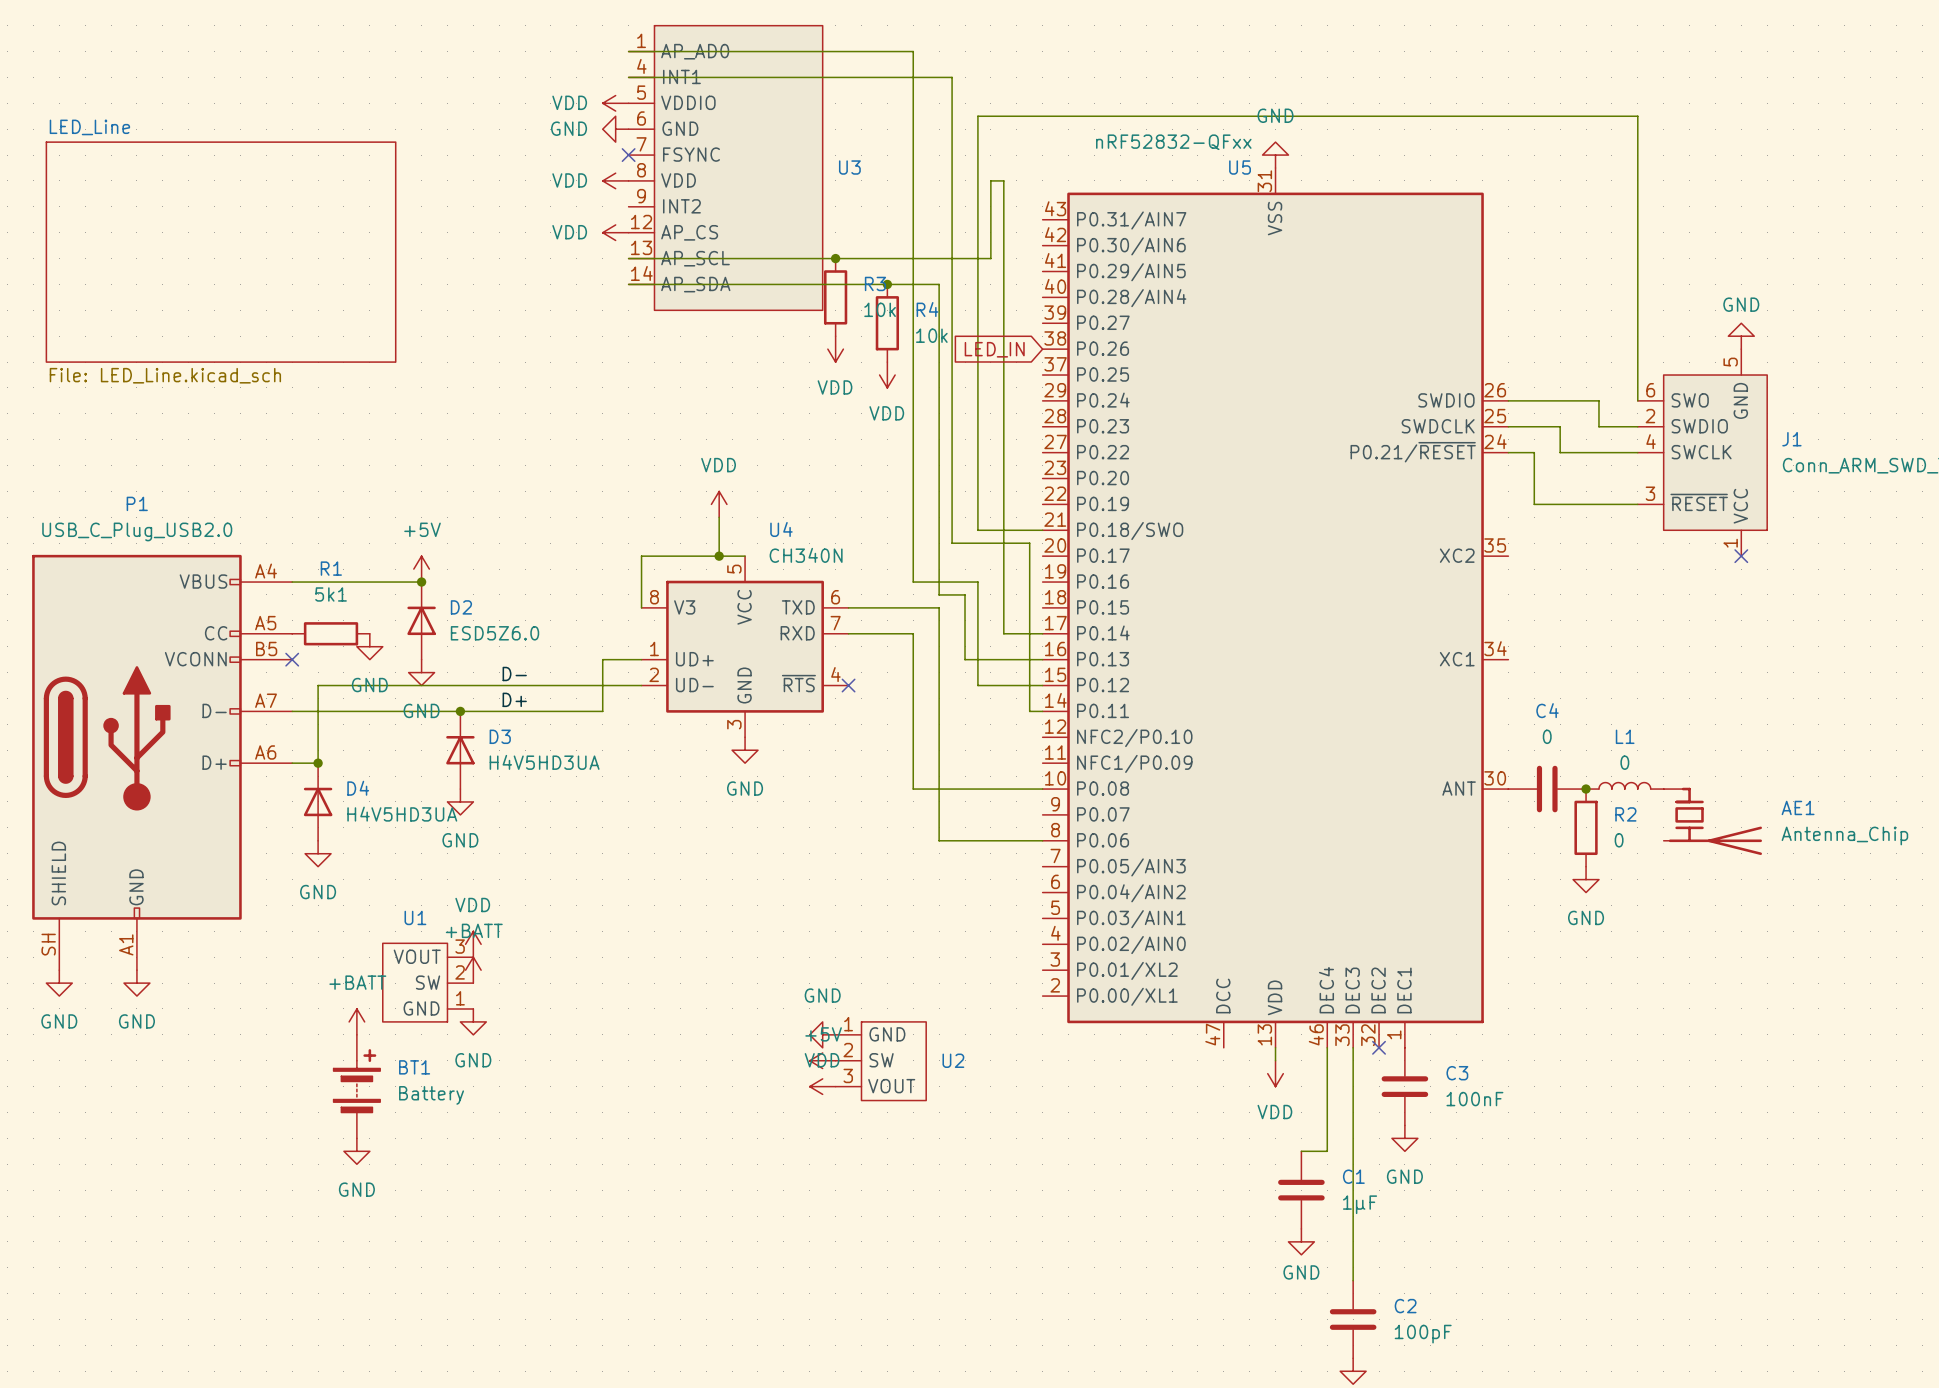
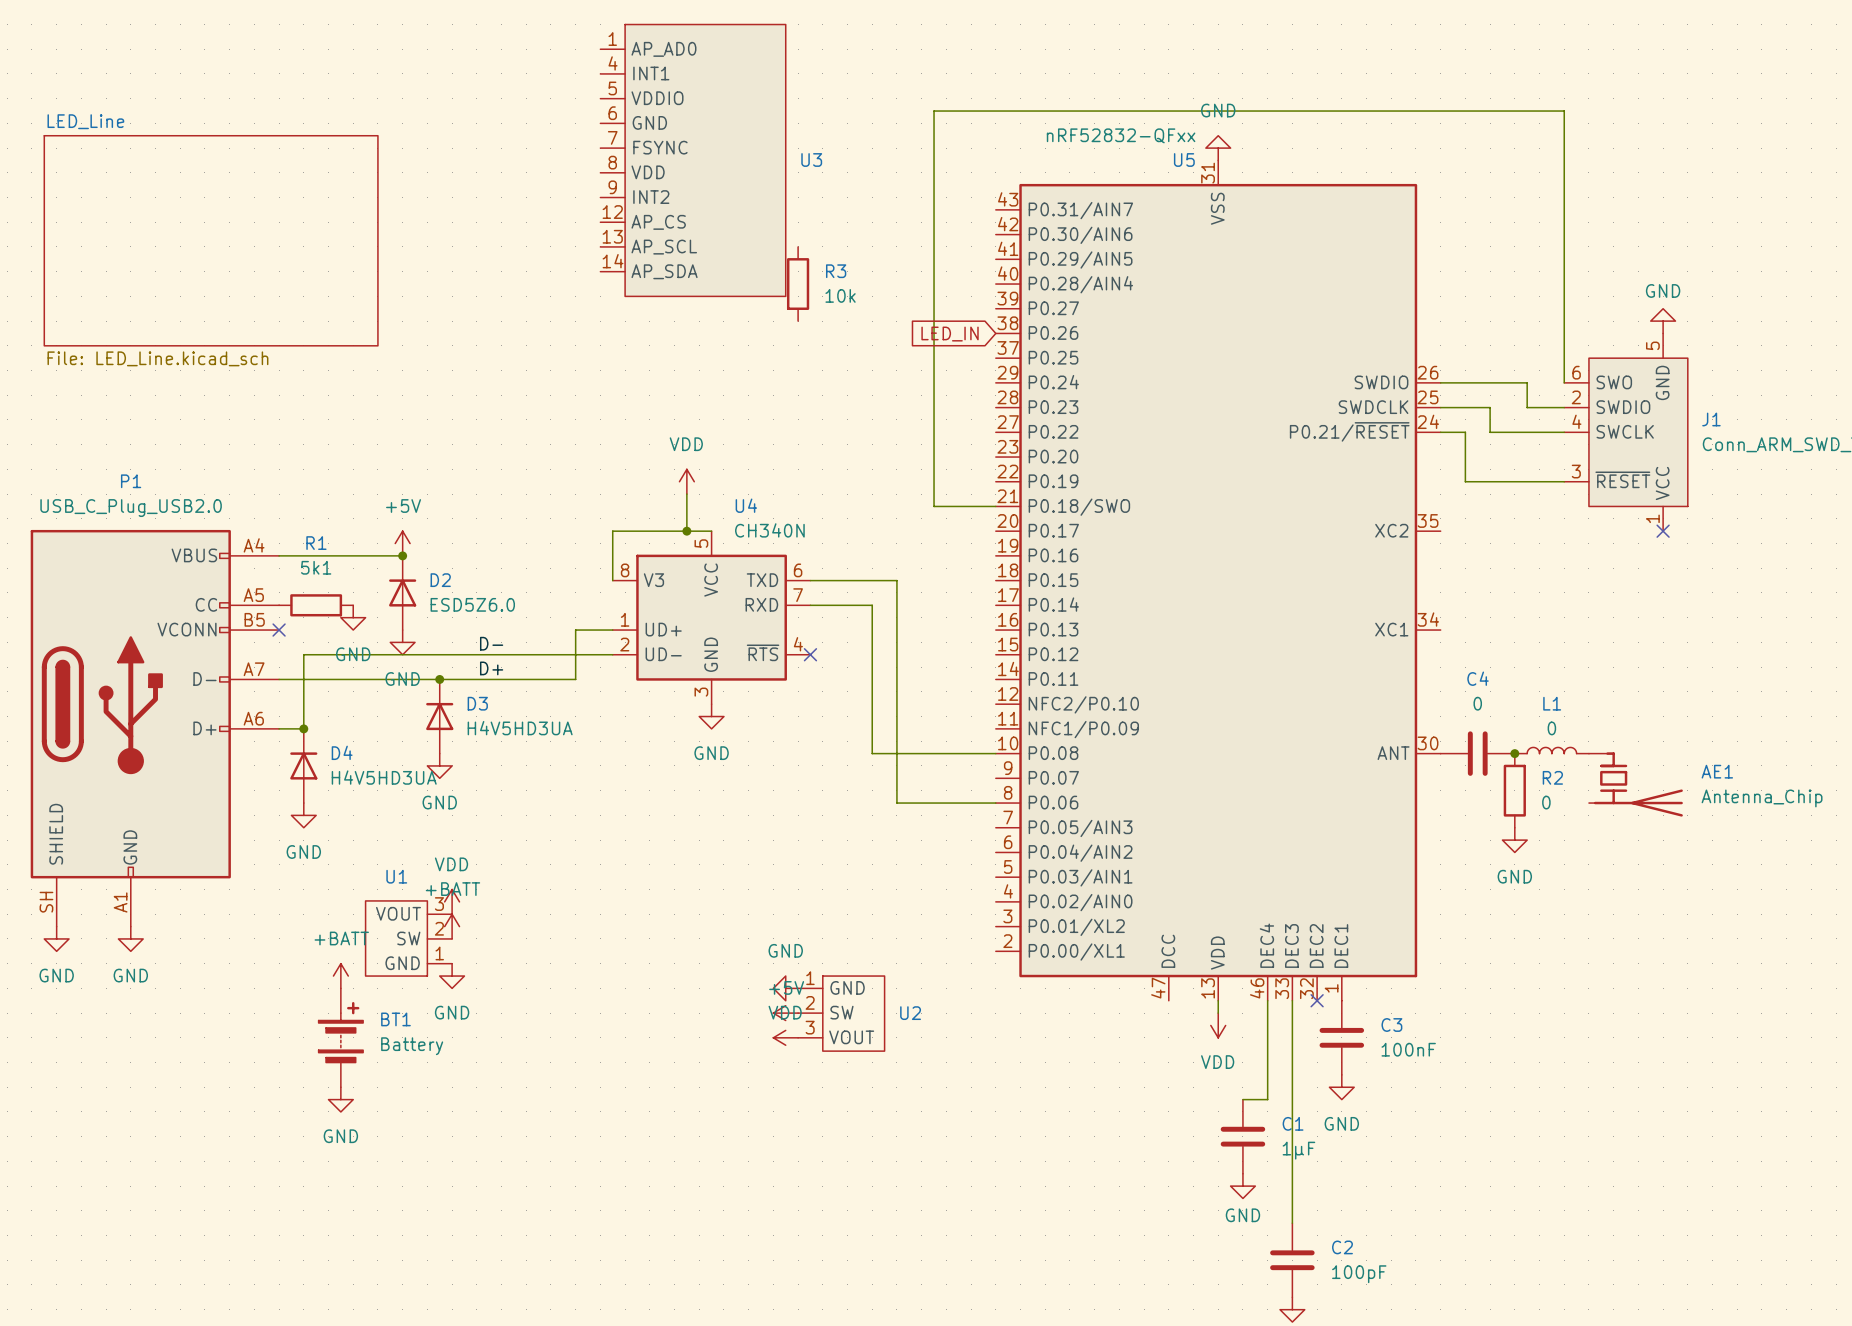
wire: (628, 51) (913, 51) (913, 582) (977, 582) (977, 685) (1042, 685) -> none
wire: (628, 77) (952, 77) (952, 543) (1029, 543) (1029, 711) (1042, 711) -> none
power symbol: VDD (615, 103) -> none
power symbol: GND (615, 129) -> none
no-connect mark: (628, 155) -> none
power symbol: VDD (615, 180) -> none
power symbol: VDD (615, 232) -> none
wire: (628, 258) (990, 258) (990, 180) (1003, 180) (1003, 633) (1042, 633) -> none
junction: (835, 258) -> none
wire: (628, 284) (939, 284) (939, 594) (965, 594) (965, 659) (1042, 659) -> none
junction: (887, 284) -> none
R4: 10k (887, 323) -> none
power symbol: VDD (835, 349) -> none
power symbol: VDD (887, 375) -> none

